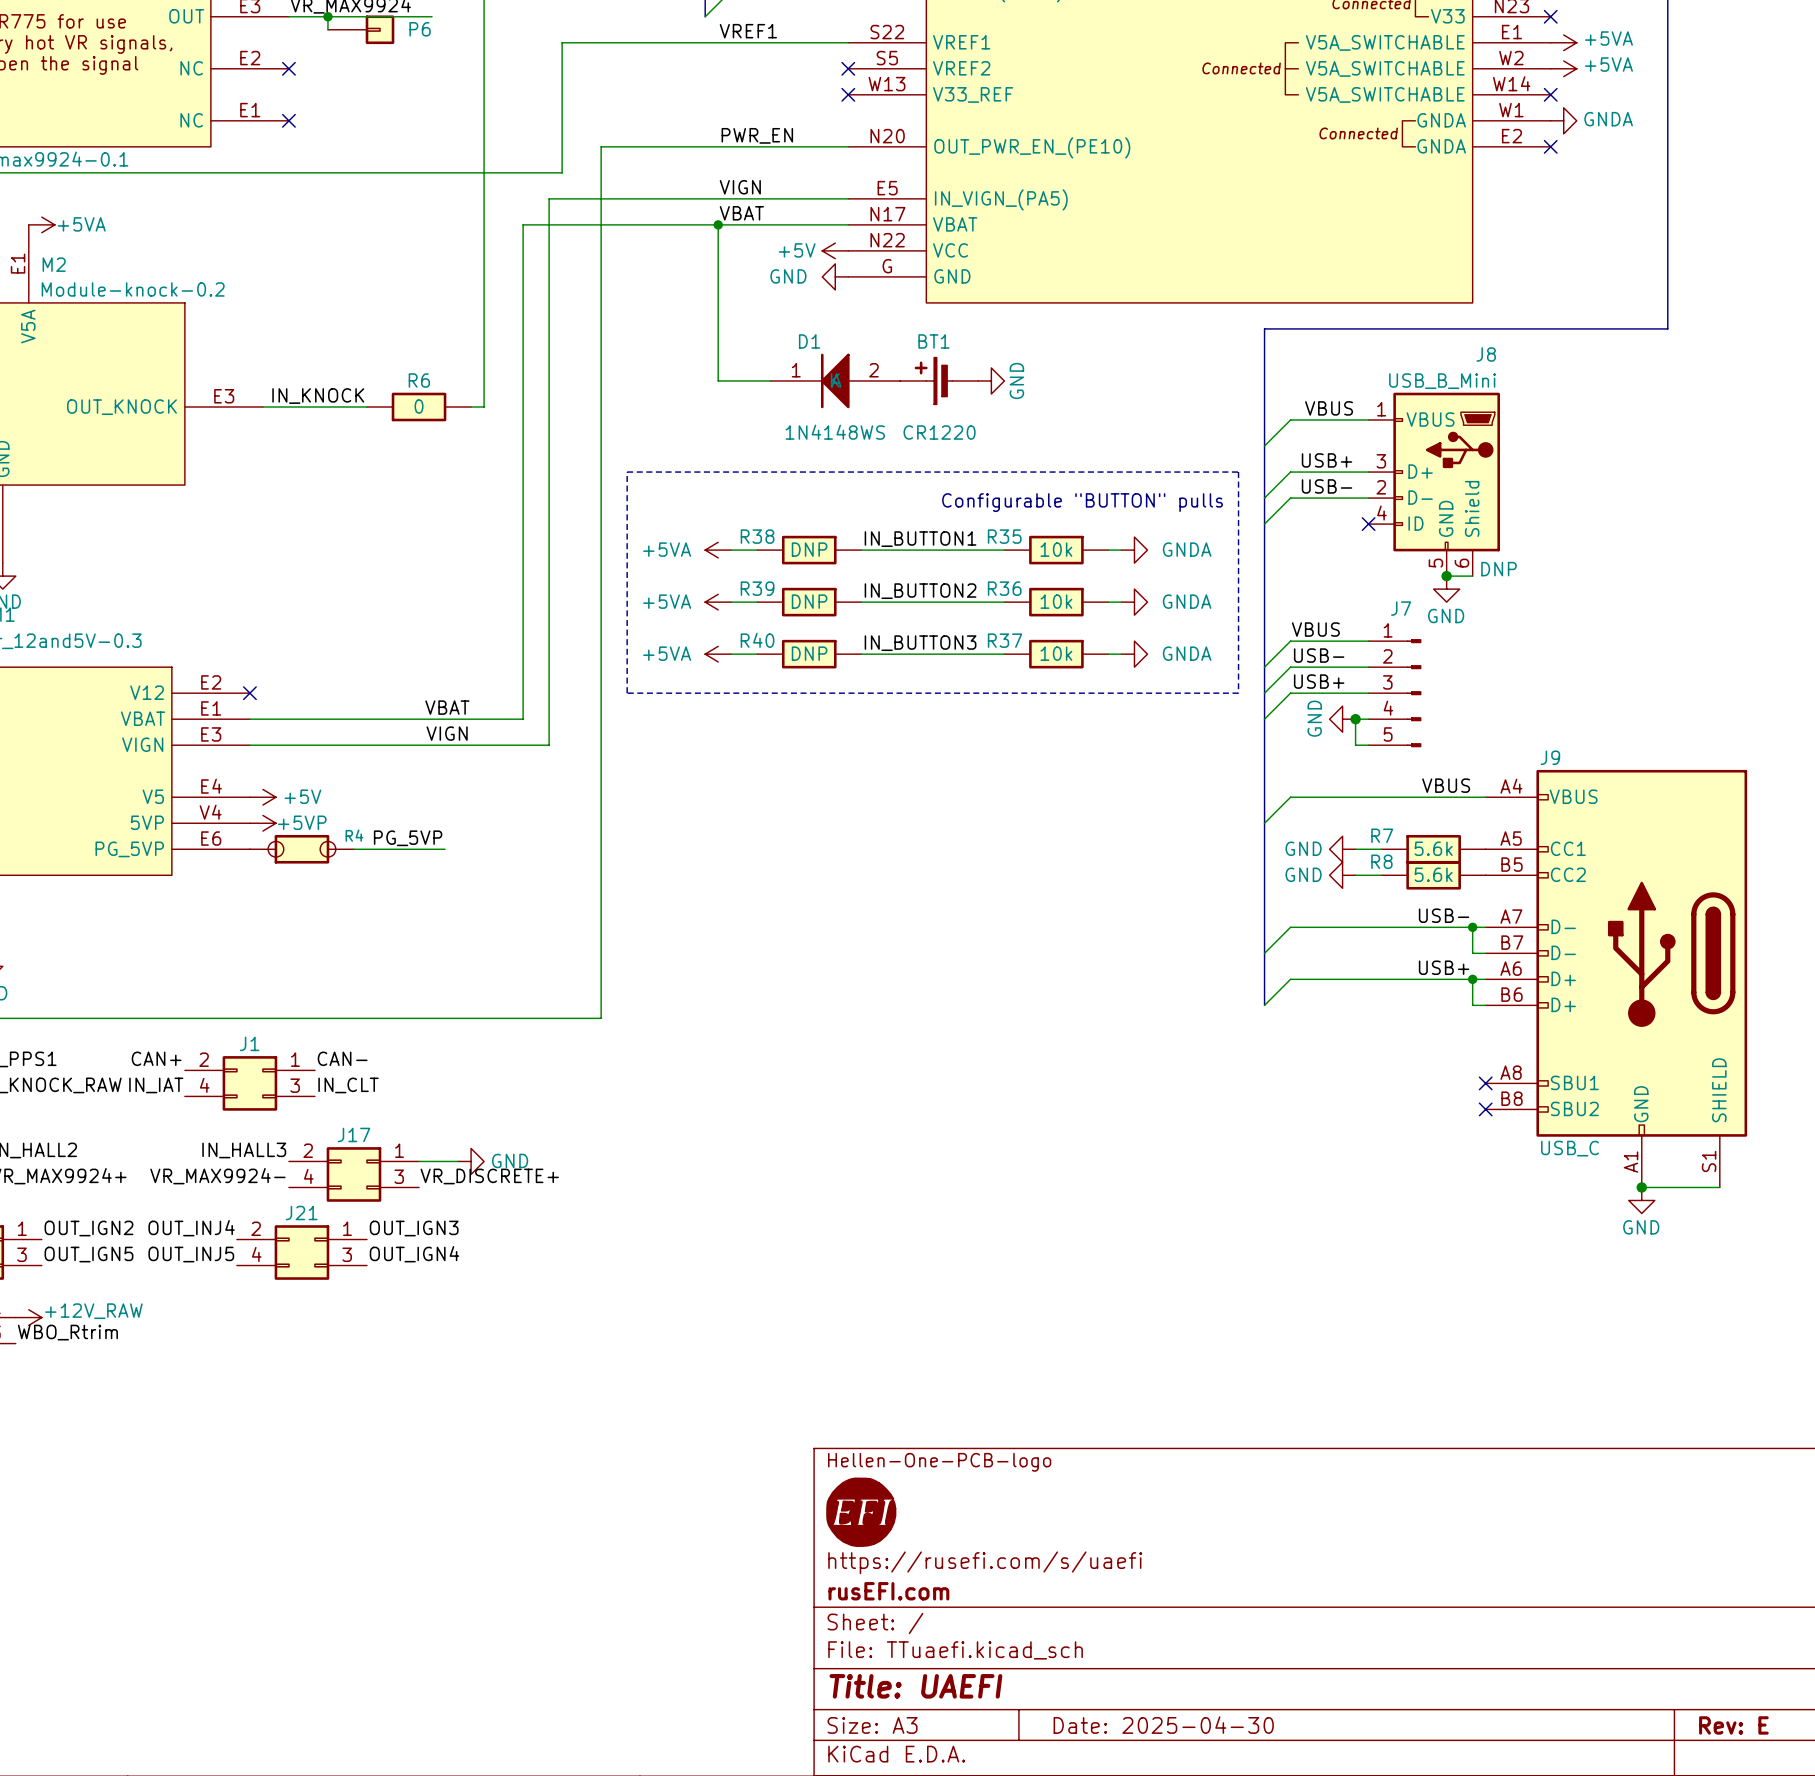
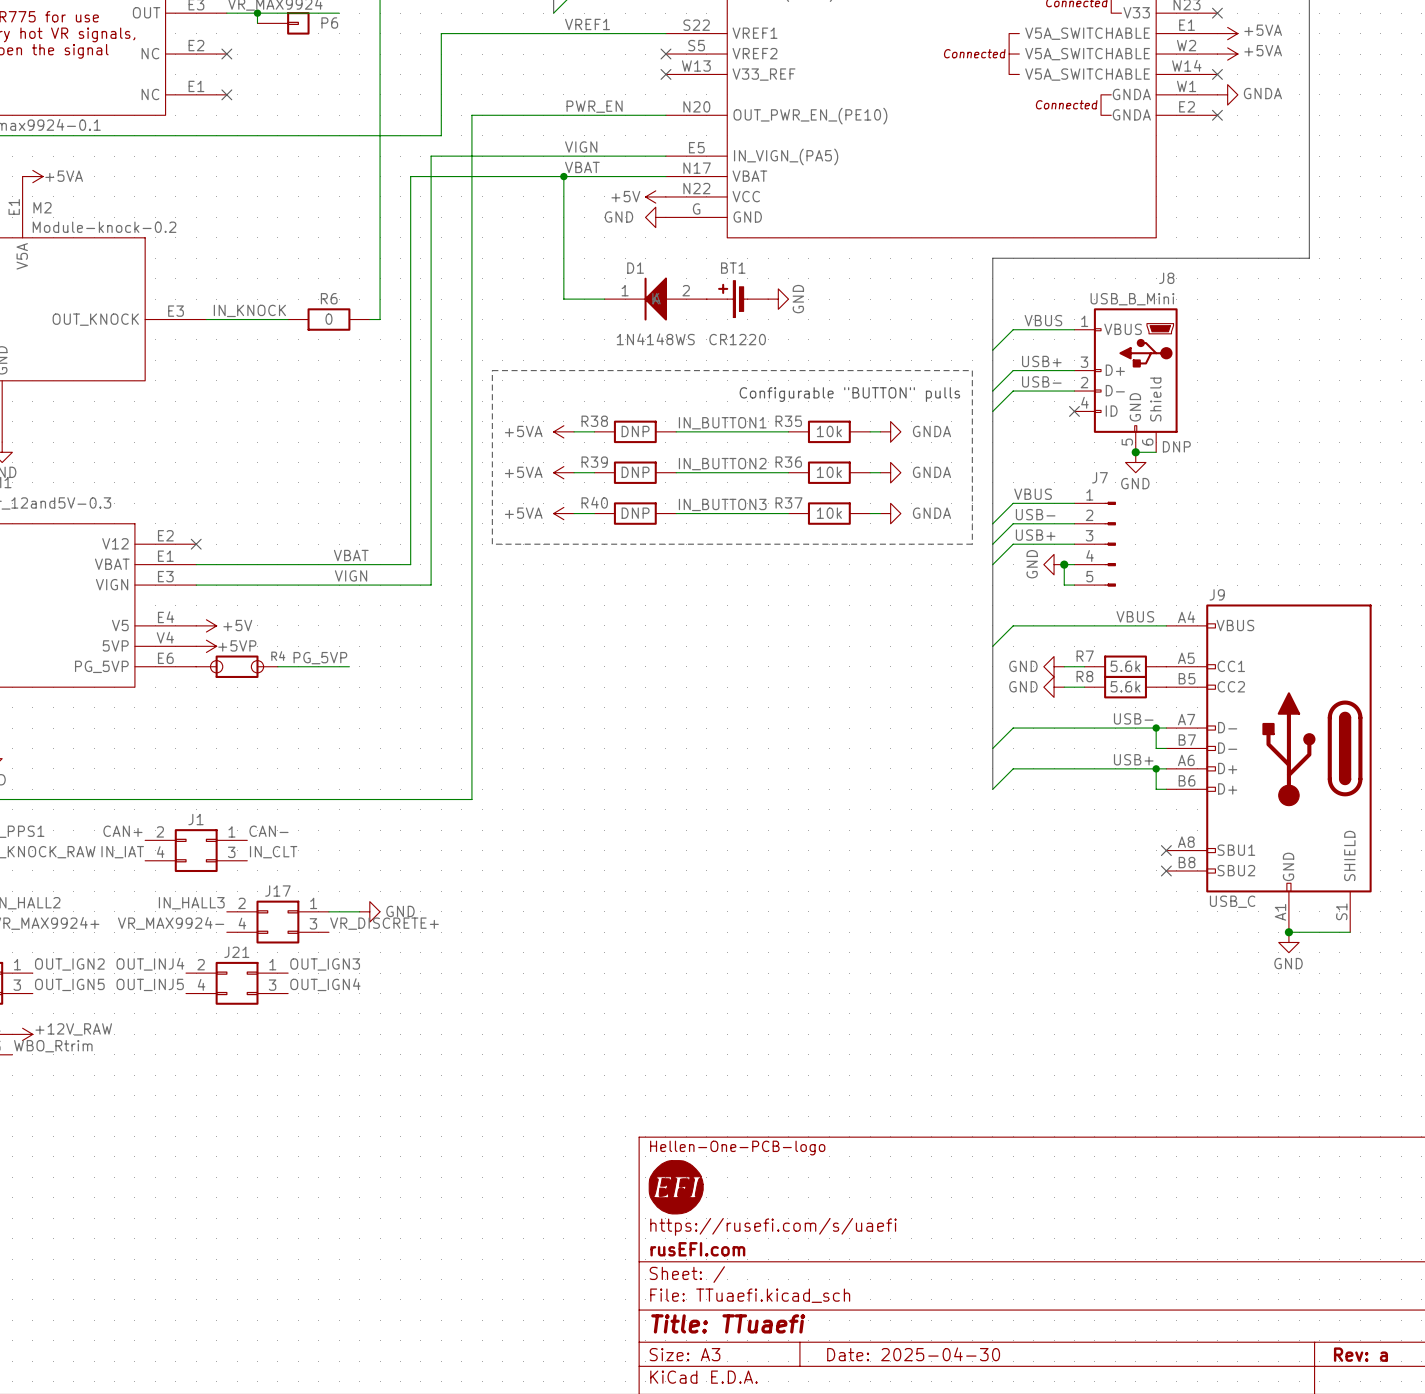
title block: Title: UAEFI (915, 1686) -> Title: TTuaefi (728, 1323)
title block: Rev: E (1733, 1725) -> Rev: a (1360, 1354)

